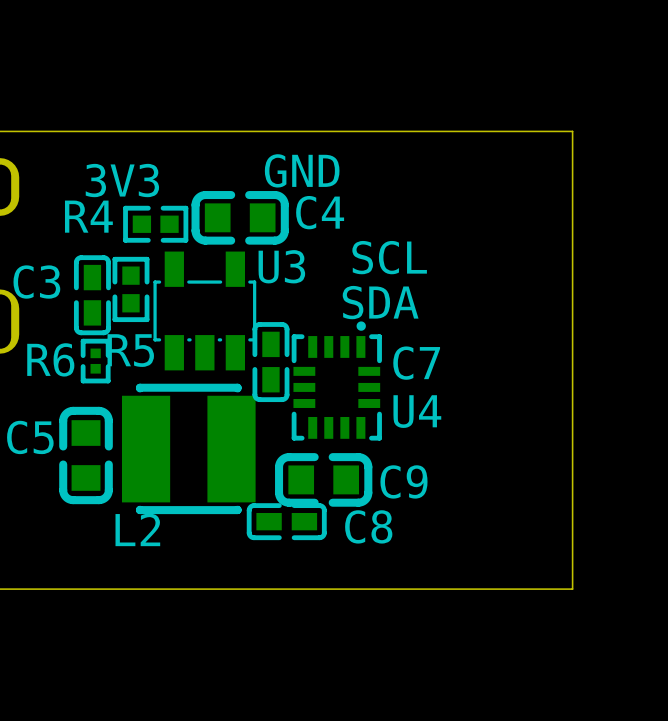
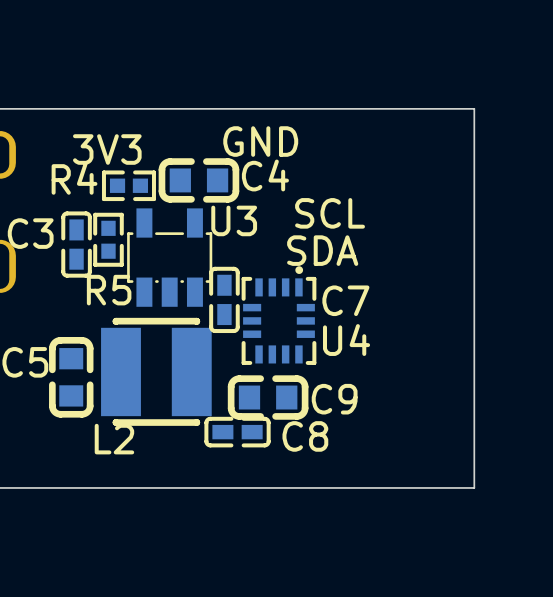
R6: (95, 361) -> none

